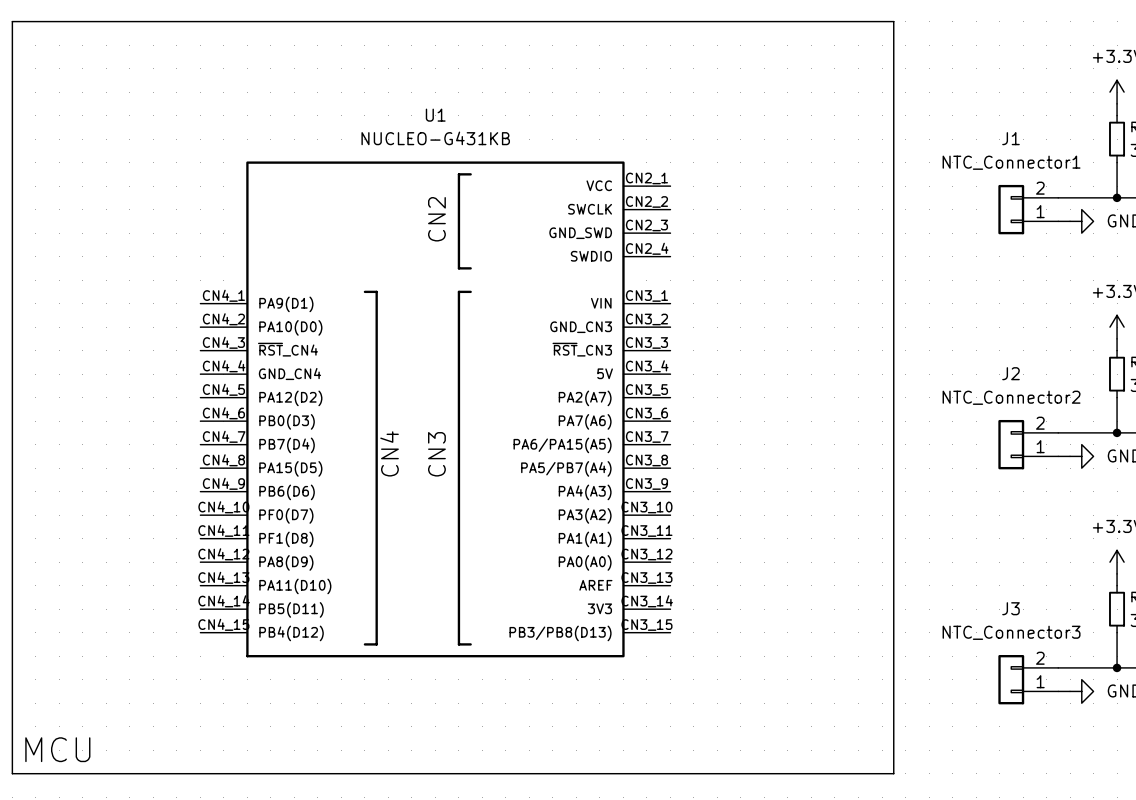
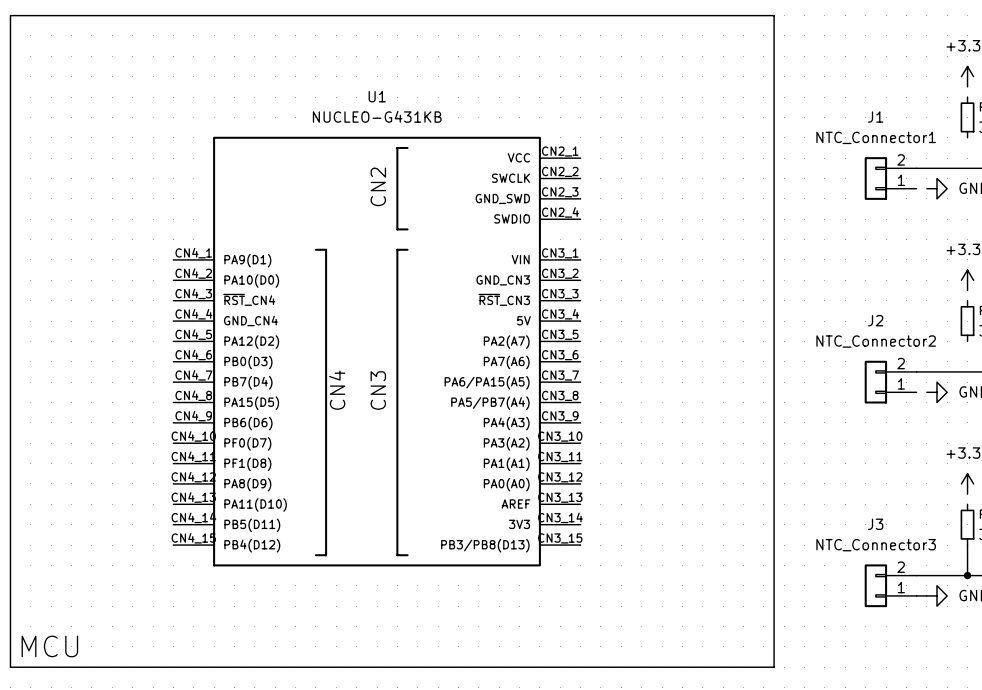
wire: (1117, 103) (1117, 115) -> none
wire: (1117, 162) (1117, 197) -> none
junction: (1117, 197) -> none
wire: (1058, 221) (1070, 221) -> none
wire: (1117, 338) (1117, 350) -> none
wire: (1117, 397) (1117, 432) -> none
junction: (1117, 432) -> none
wire: (1058, 456) (1070, 456) -> none
wire: (1117, 573) (1117, 585) -> none

